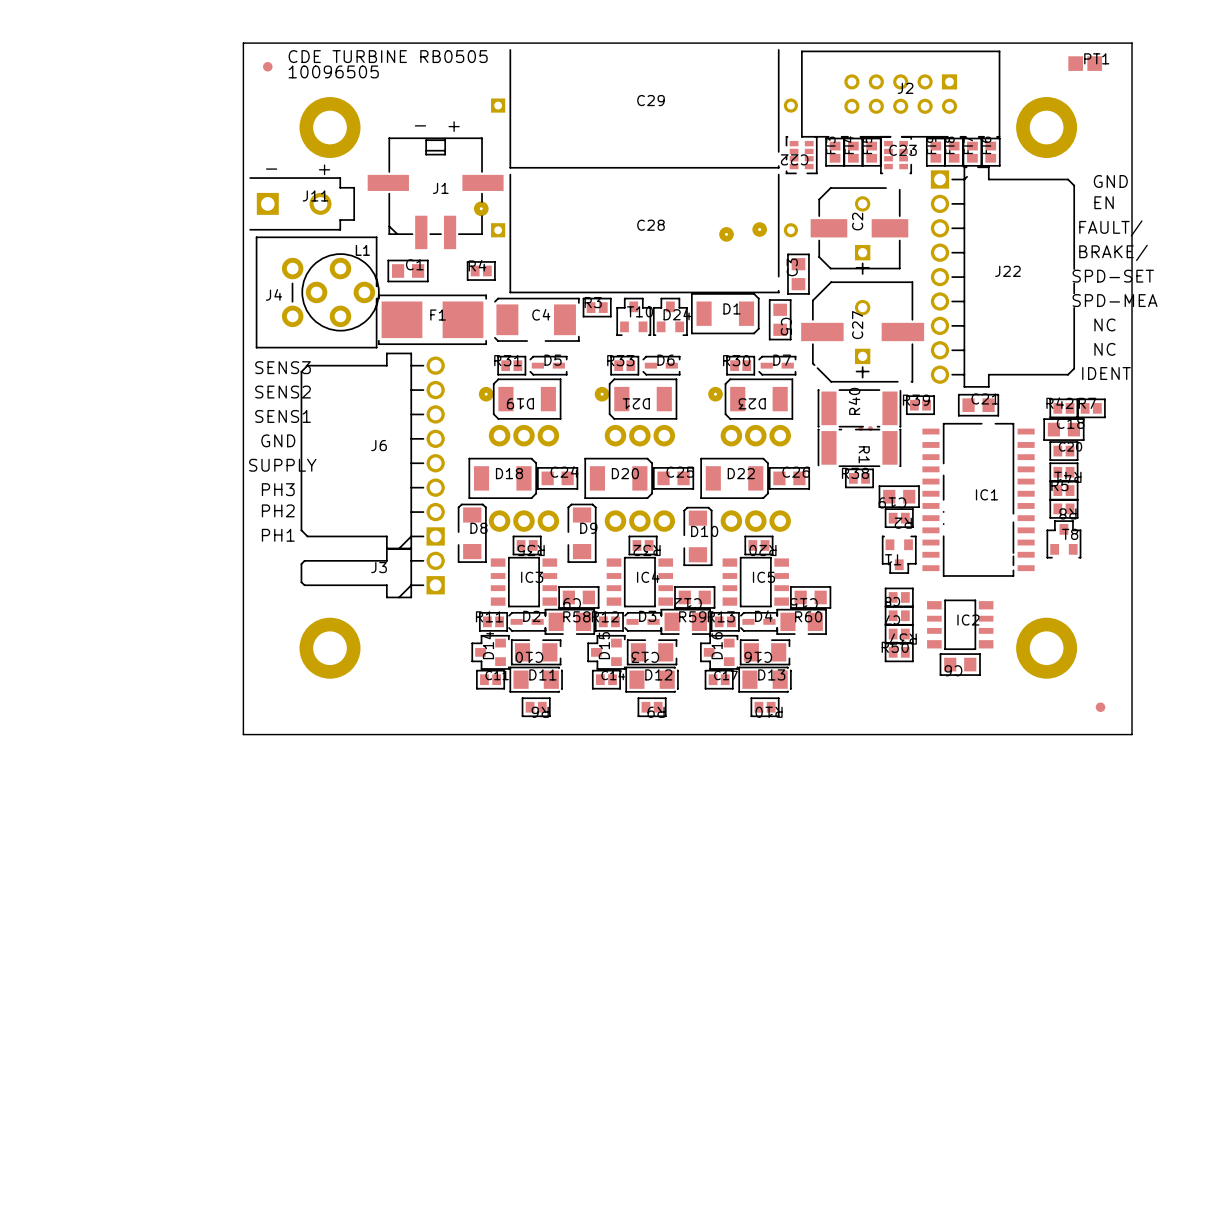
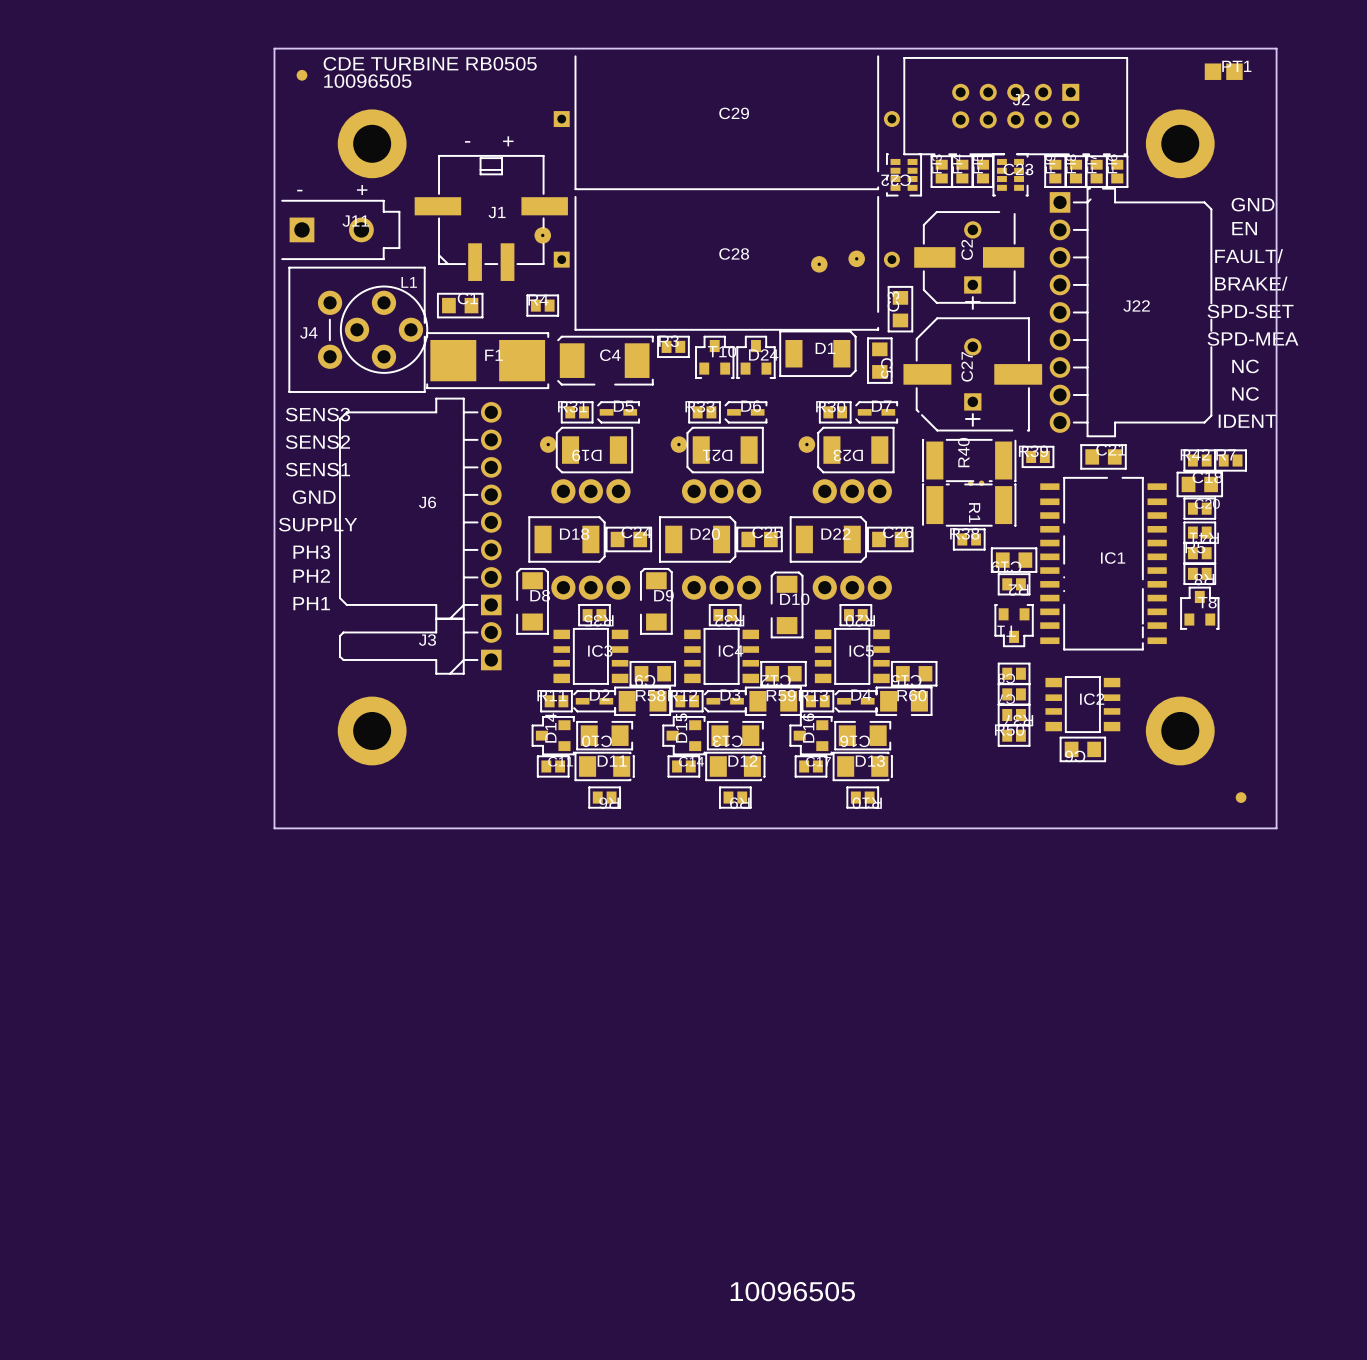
text: none -> 10096505 (792, 1291)

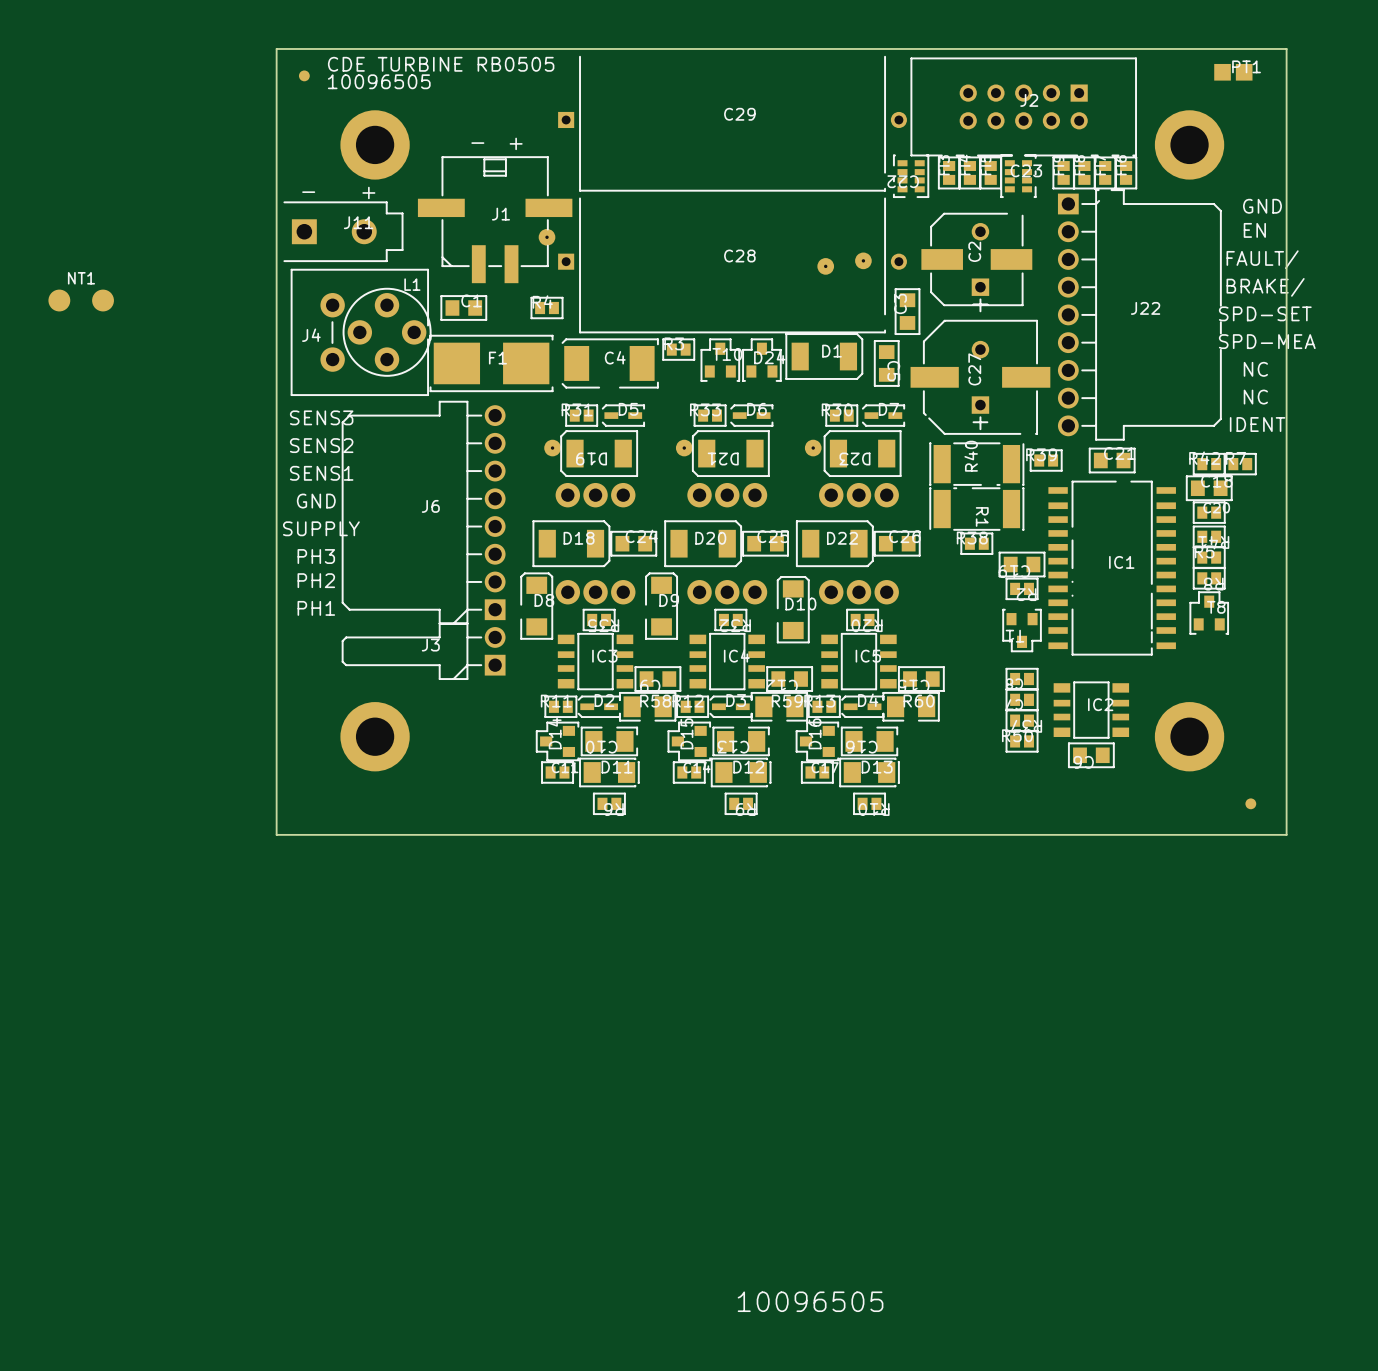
NT1: none -> (81, 300)
part: (976, 483) -> none

